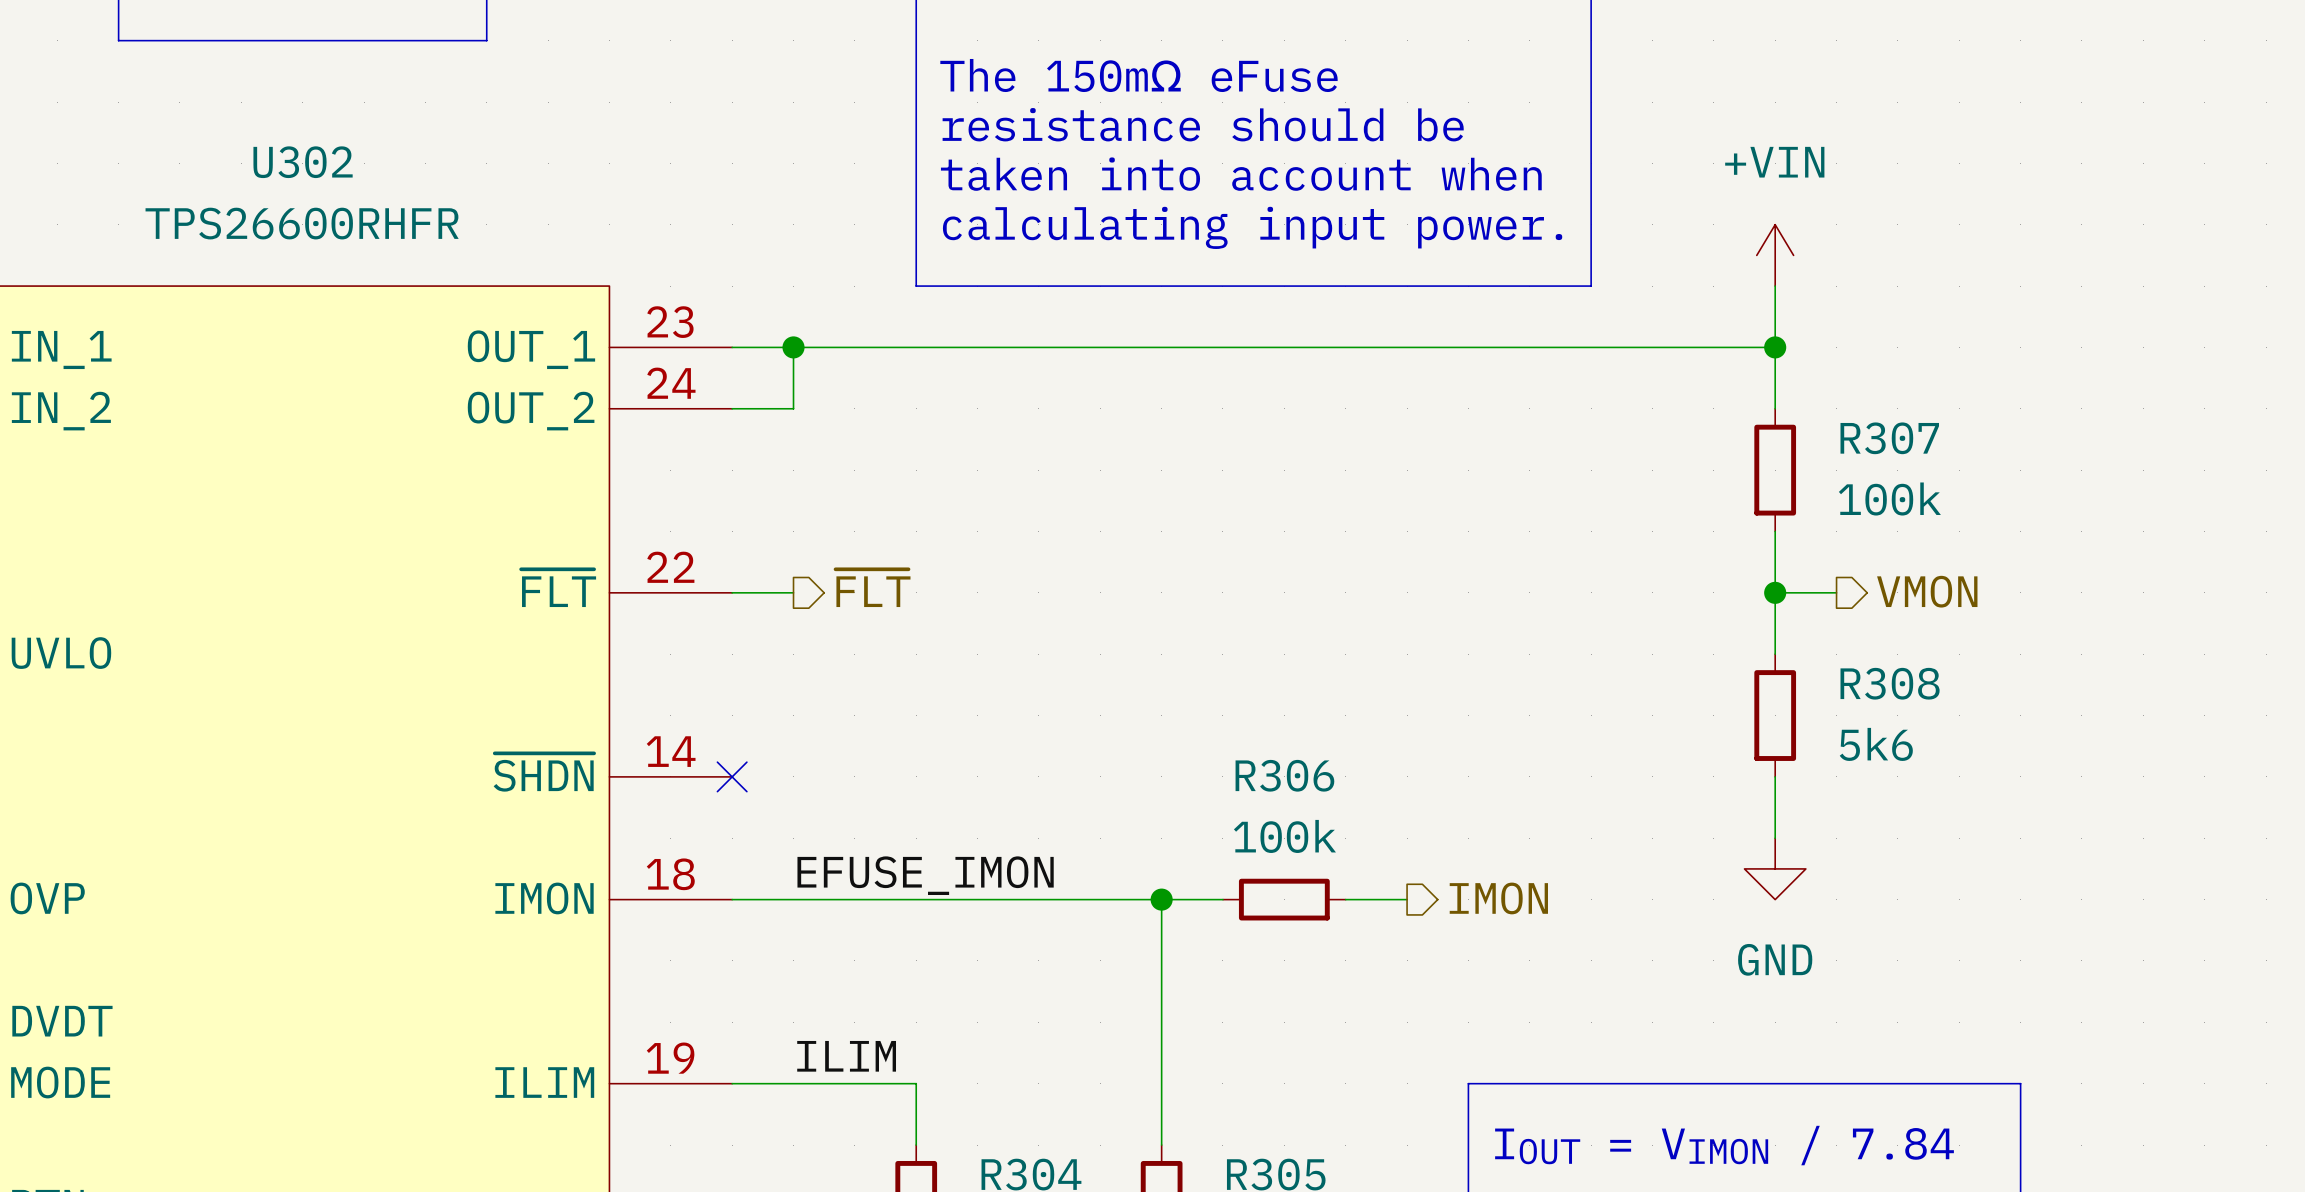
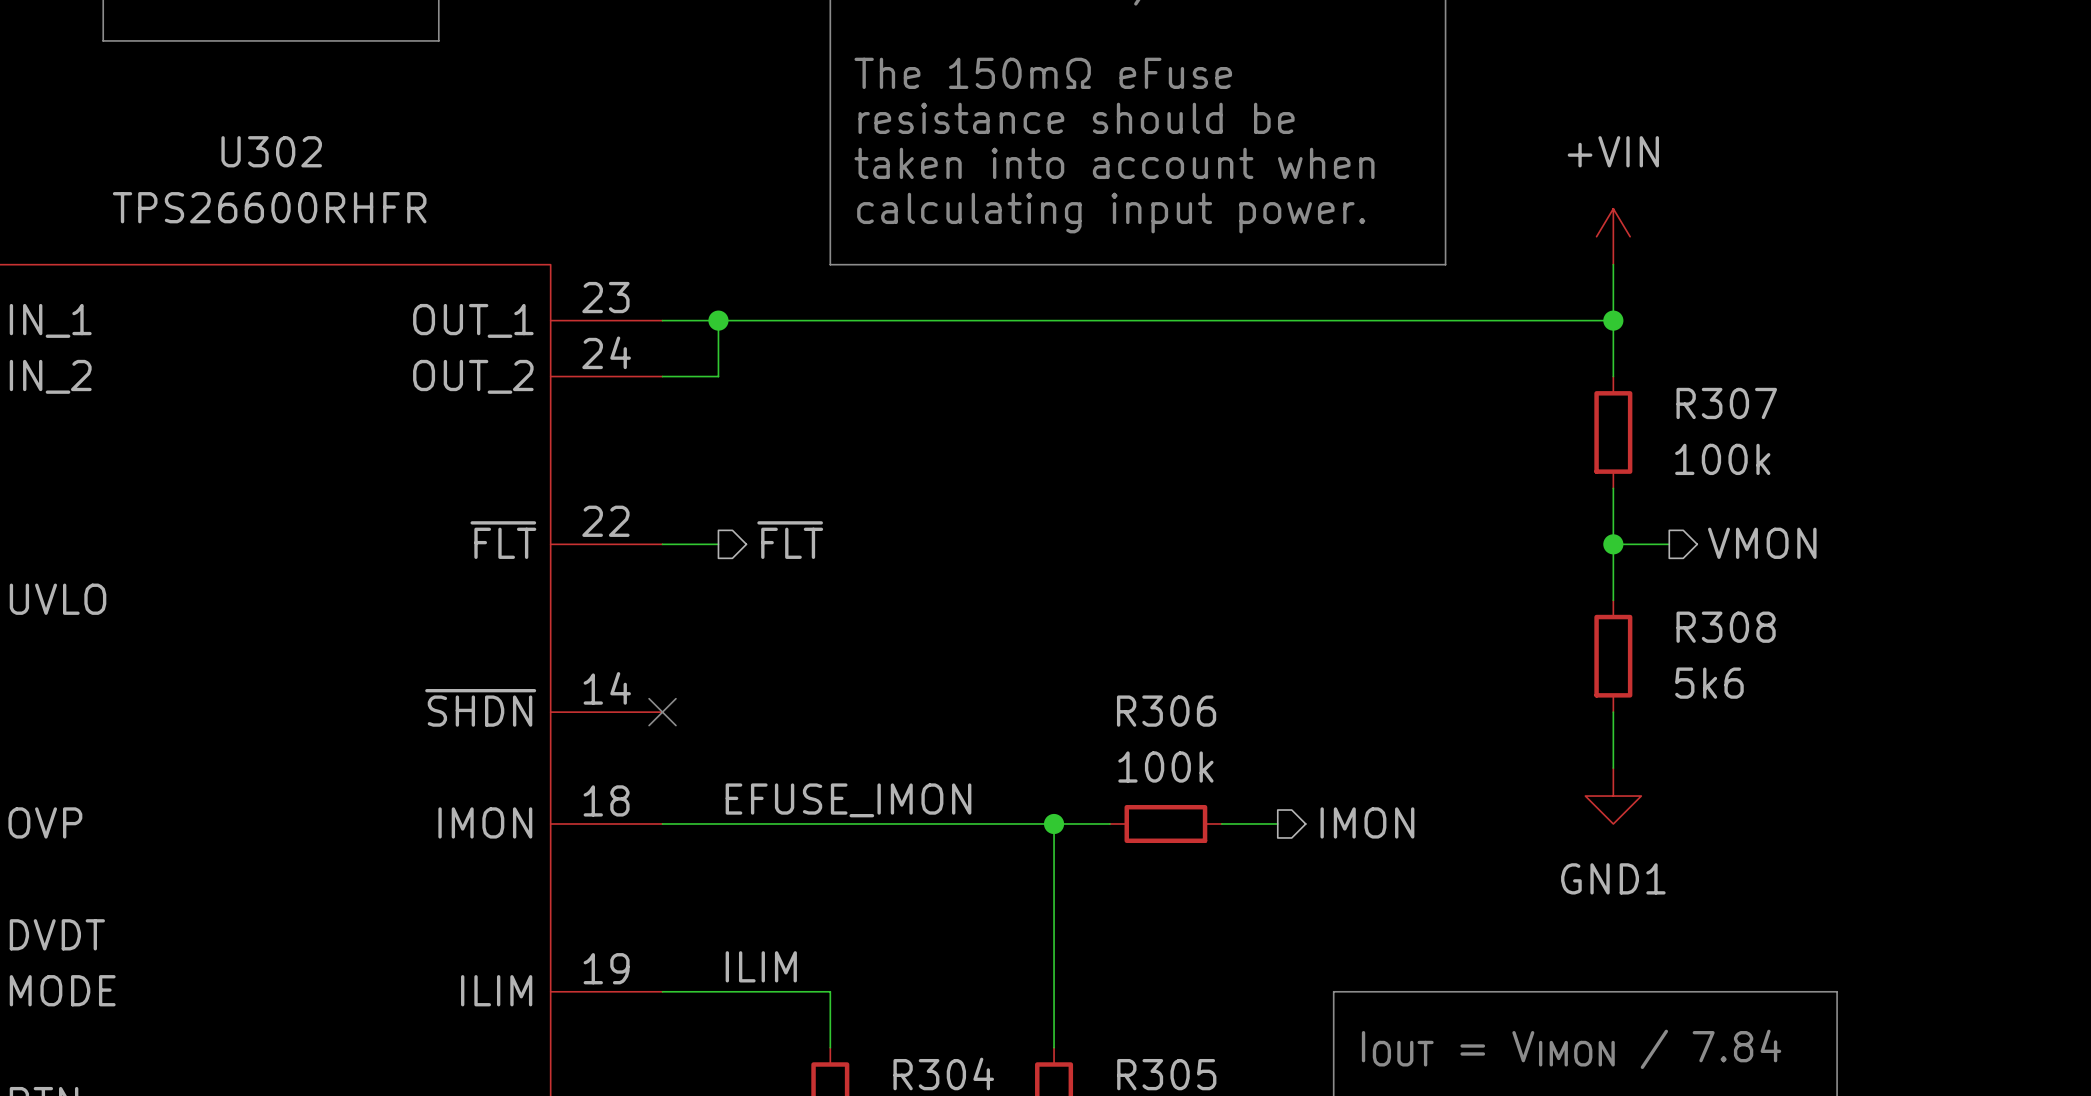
power symbol: GND (1775, 868) -> GND1 (1613, 796)

